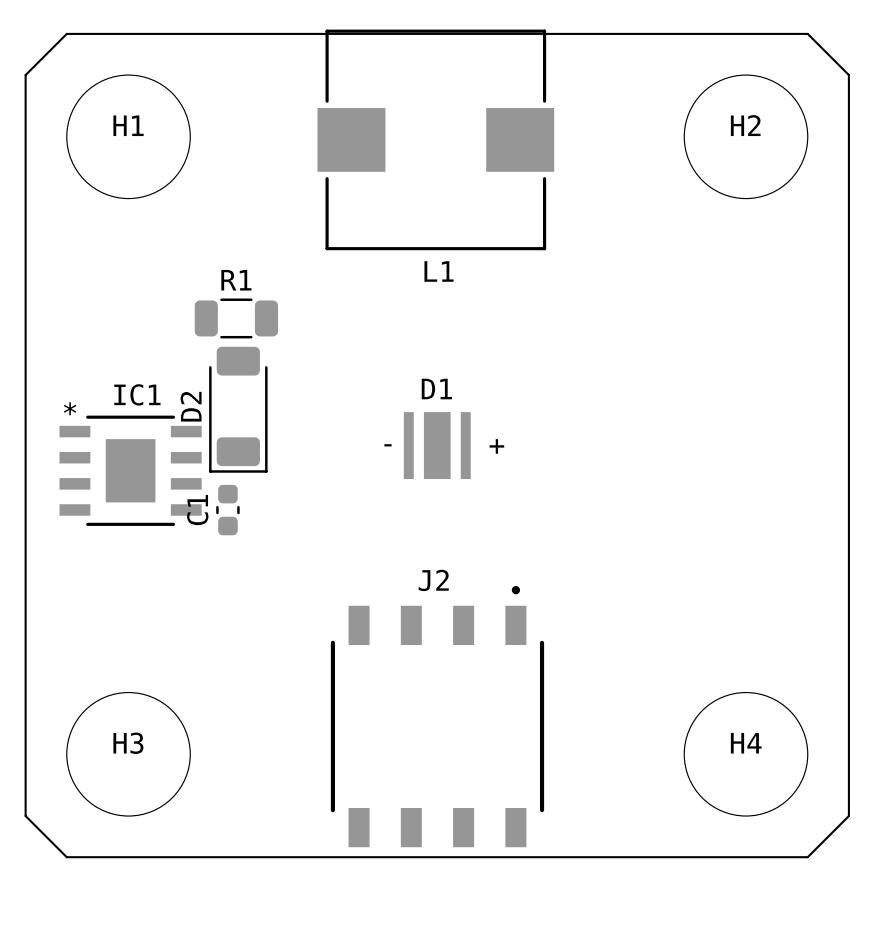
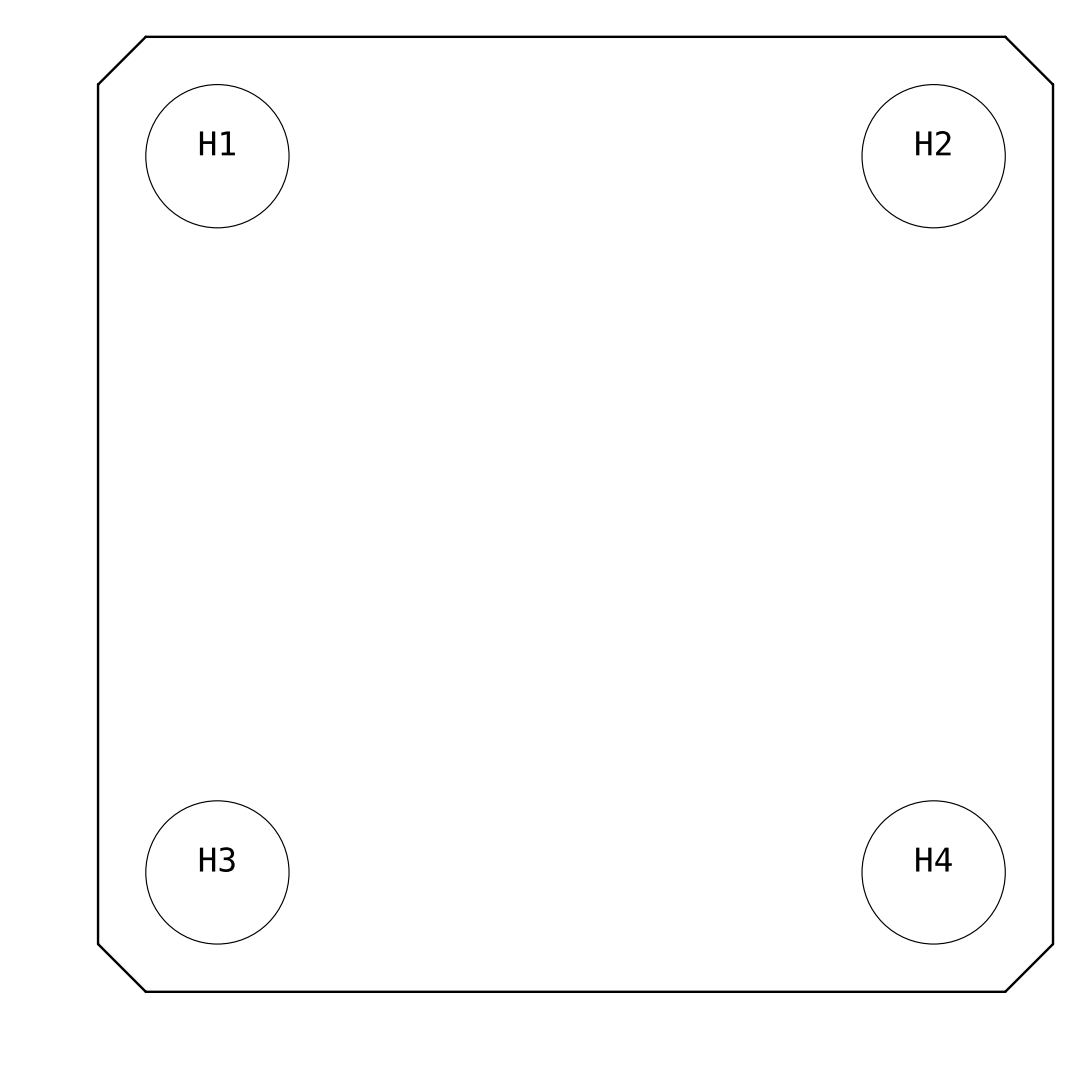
L1: (435, 139) -> none
R1: (236, 318) -> none
D2: (238, 409) -> none
D1: (437, 445) -> none
IC1: (130, 470) -> none
C1: (227, 510) -> none
J2: (437, 716) -> none

